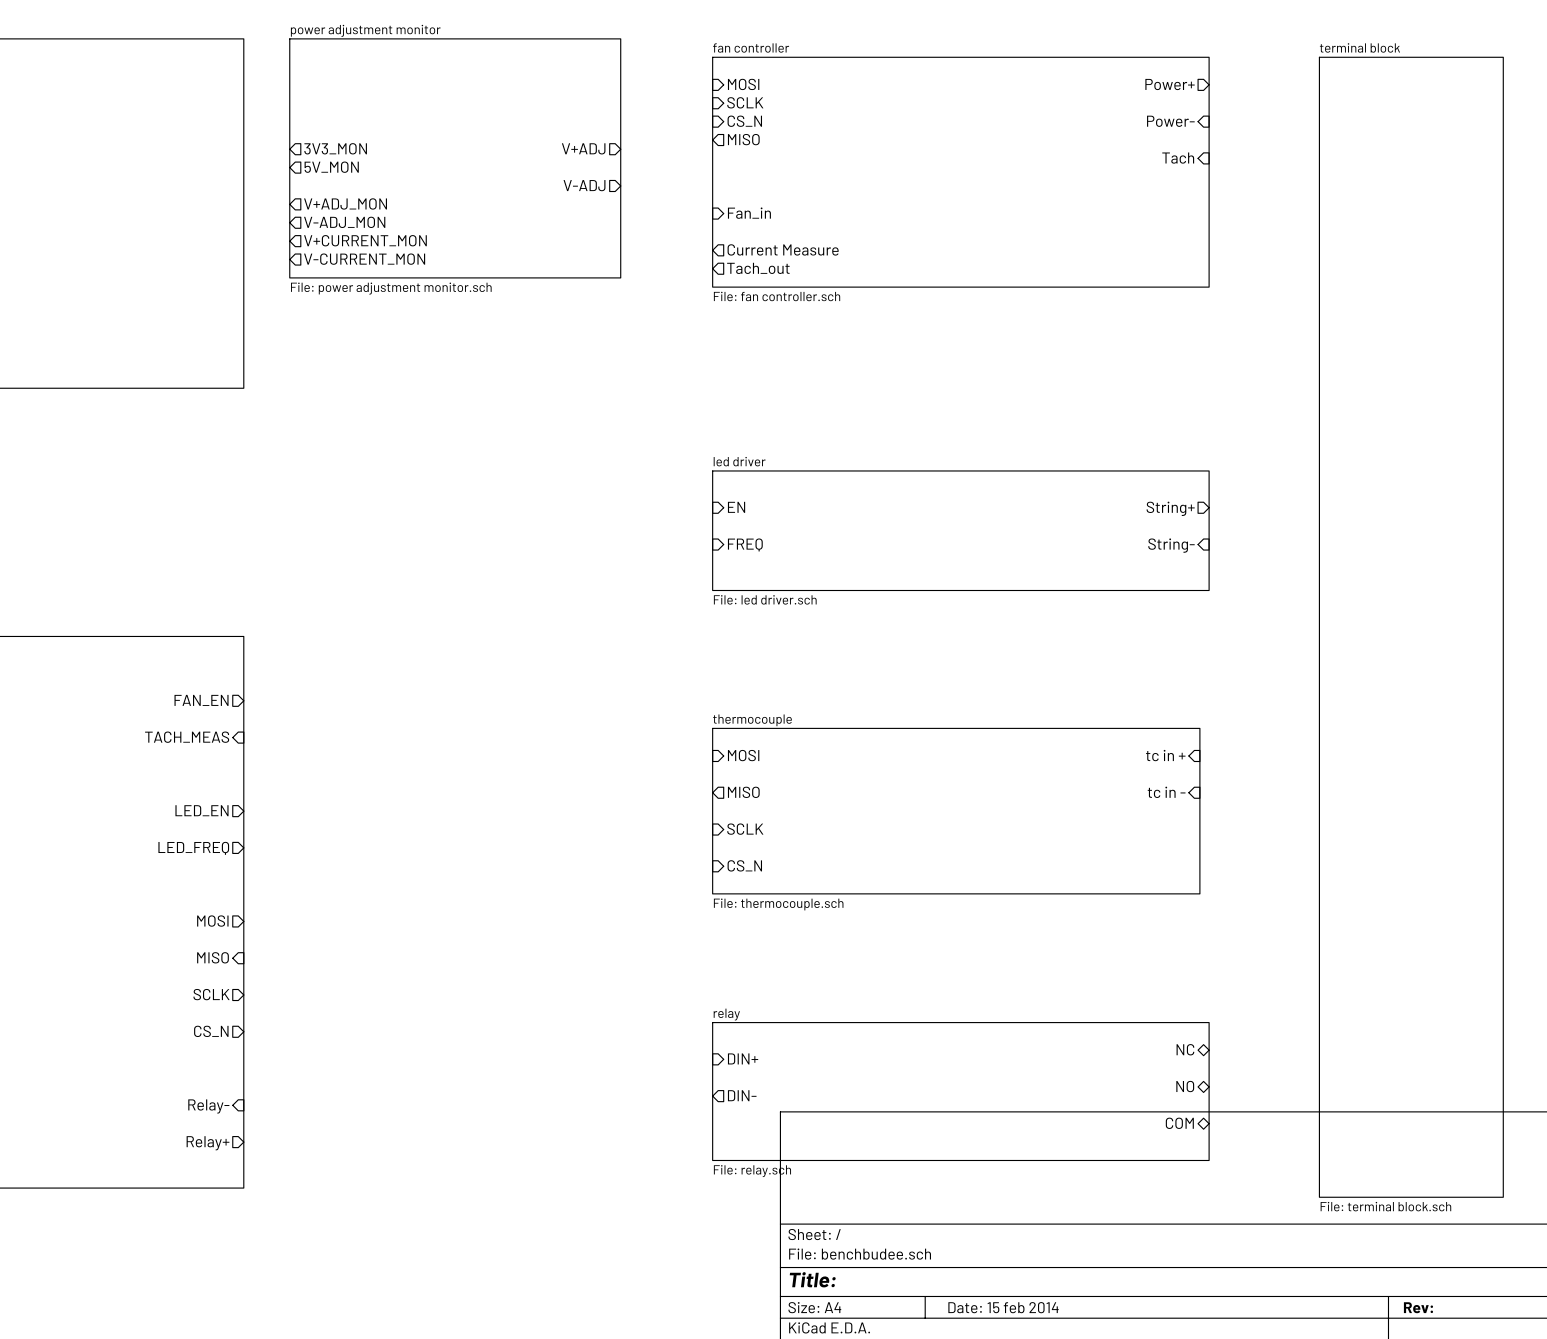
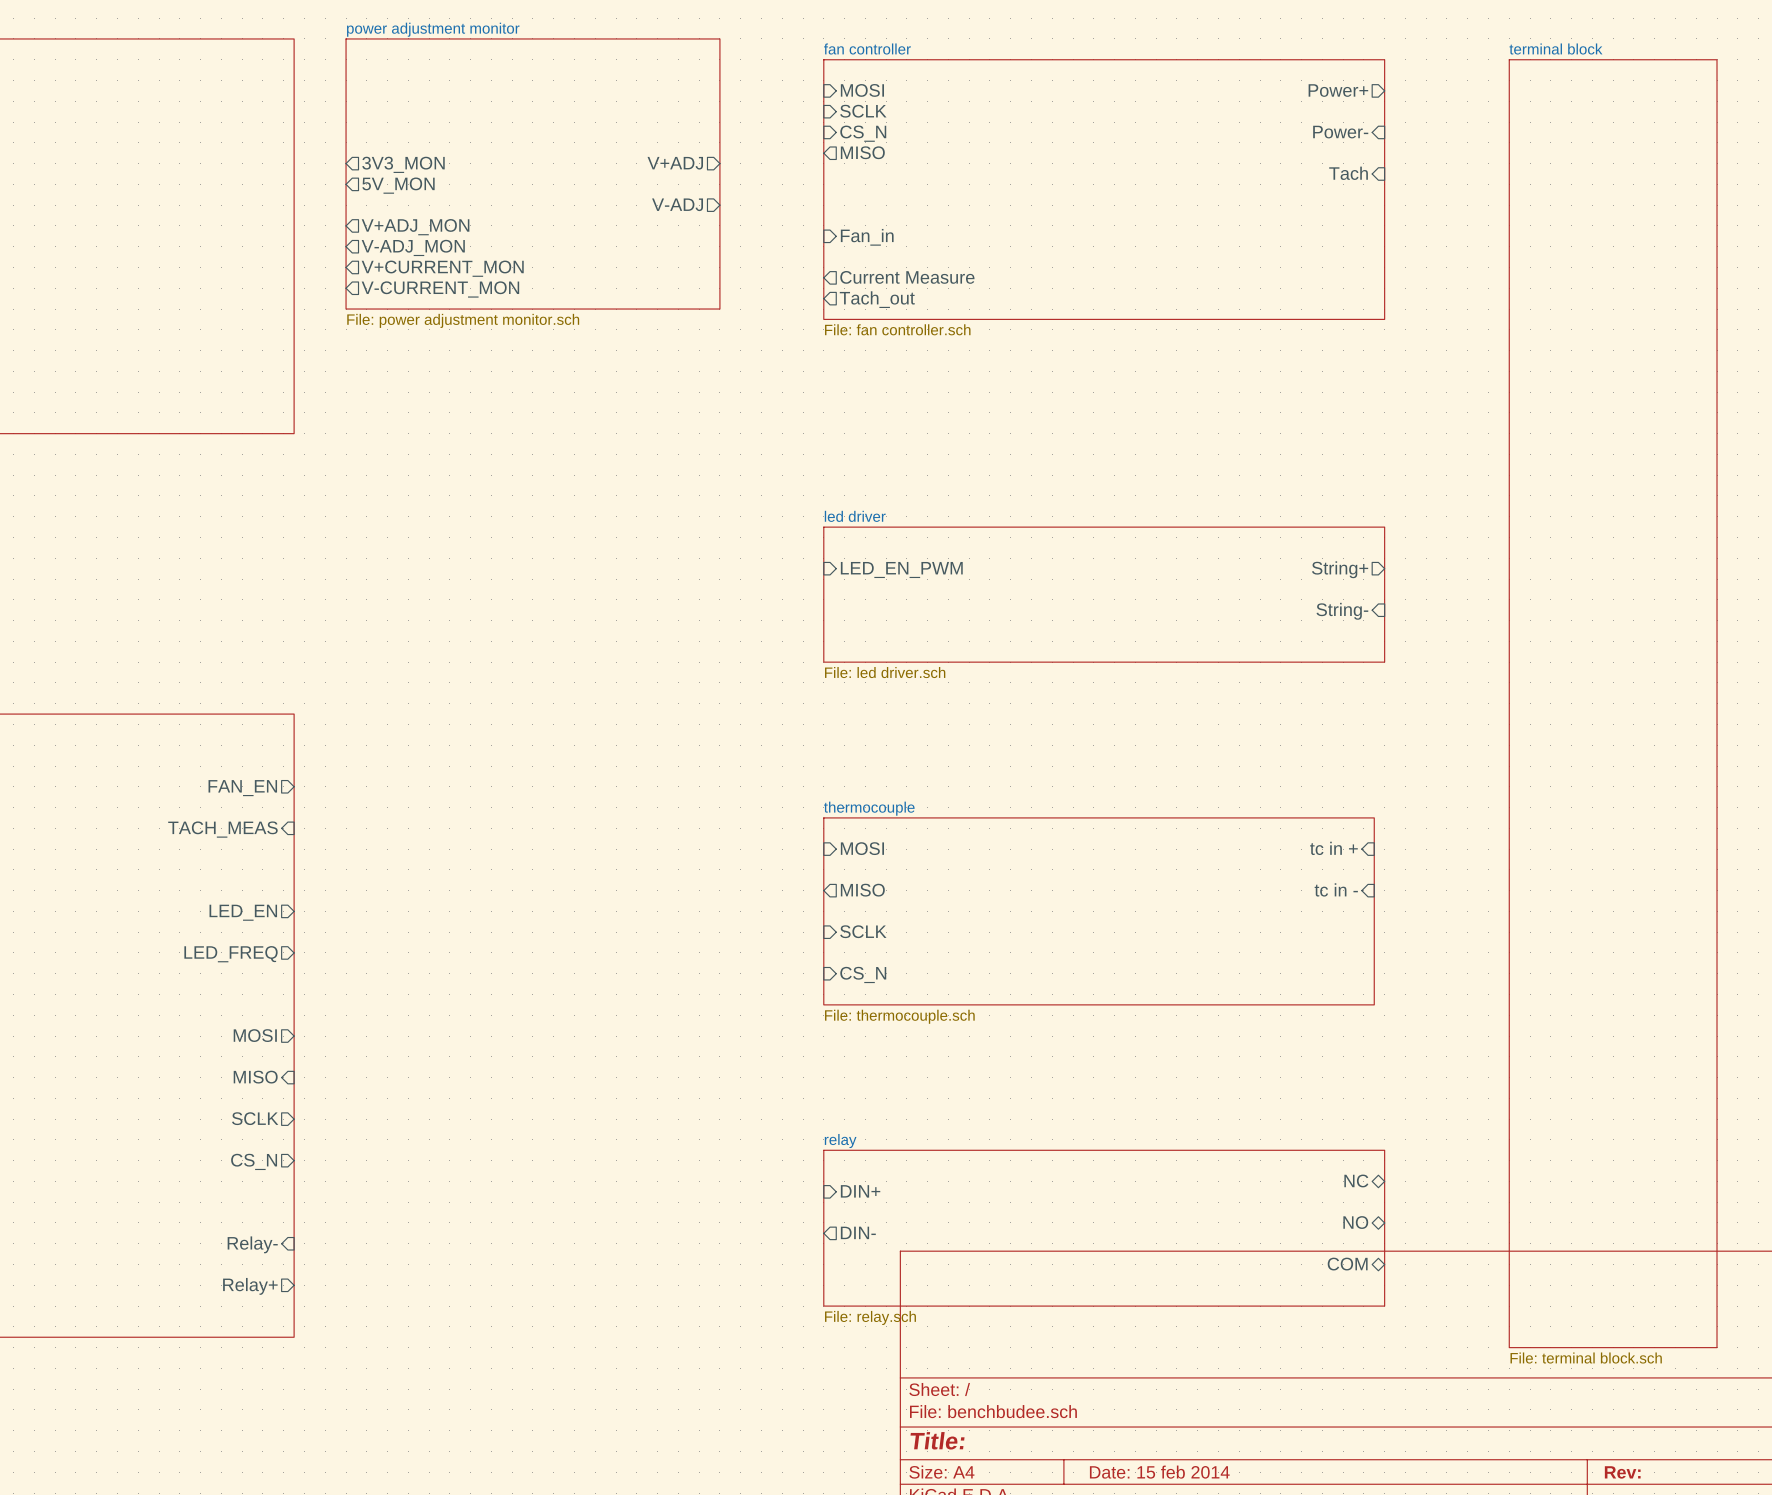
sheet pin: EN (736, 507) -> LED_EN_PWM (901, 570)
sheet pin: FREQ (745, 544) -> none

